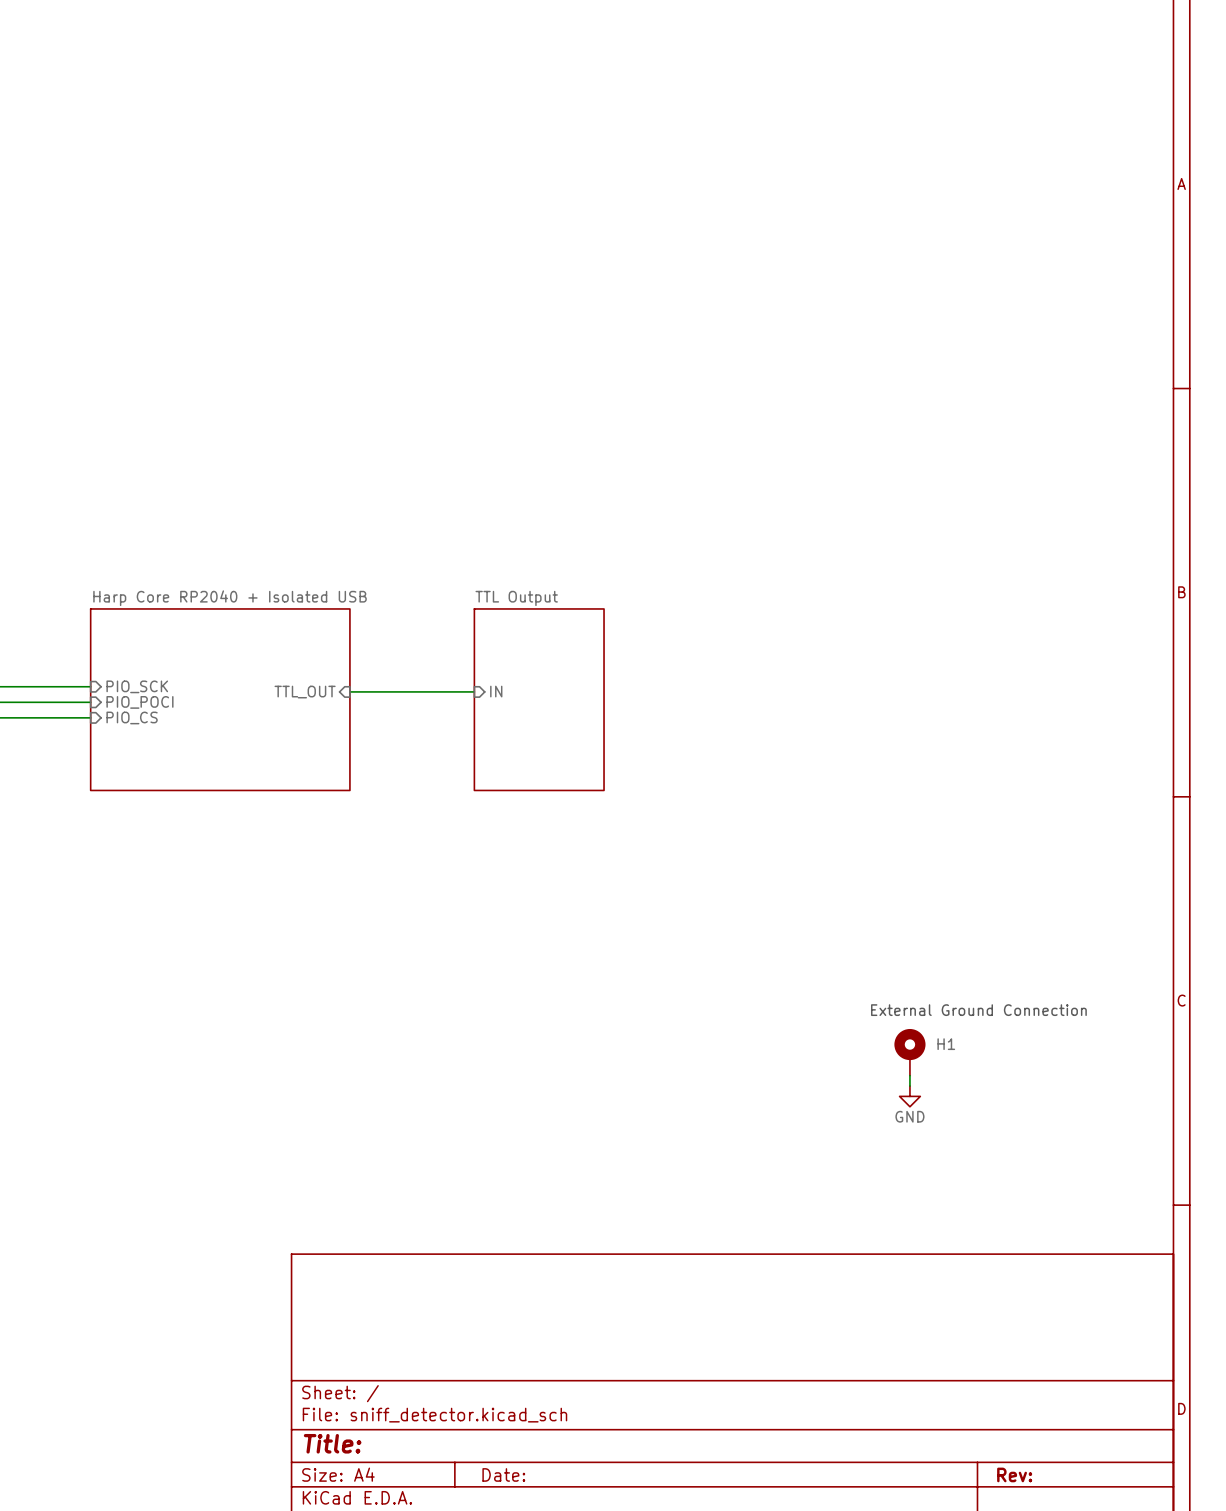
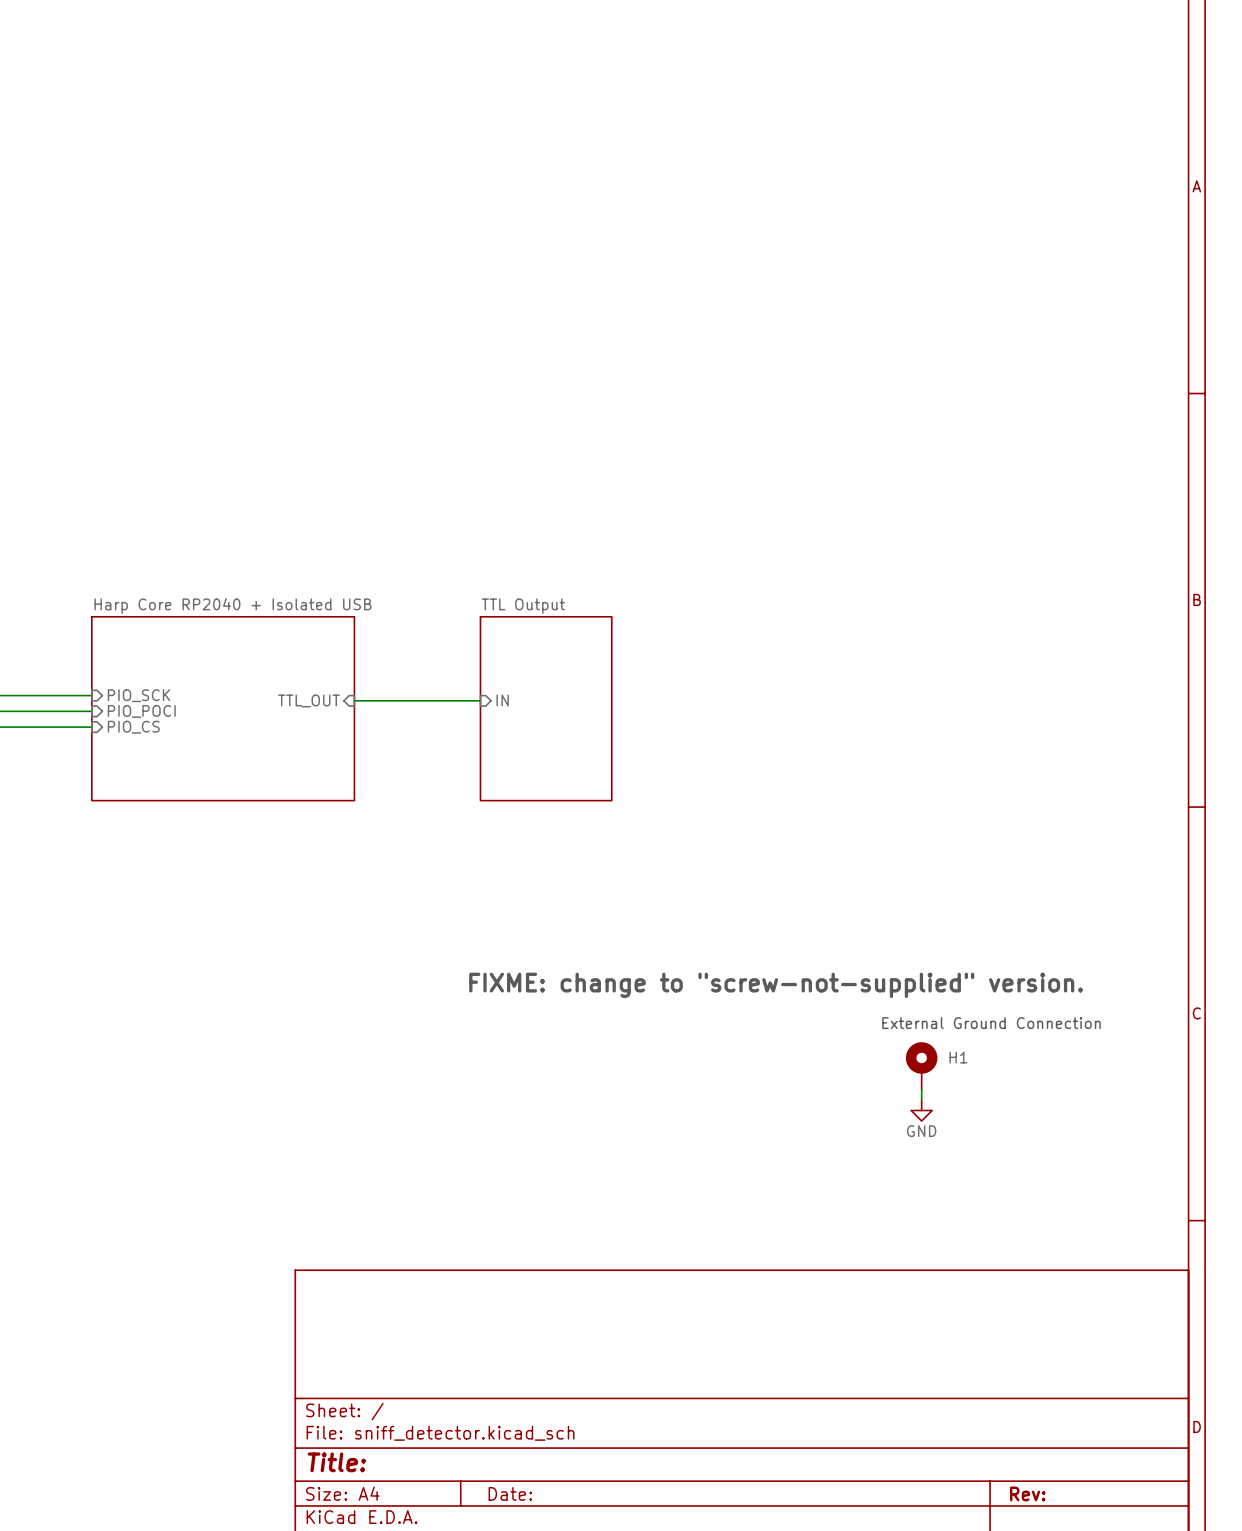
text: none -> FIXME: change to "screw-not-supplied" version. (776, 985)

